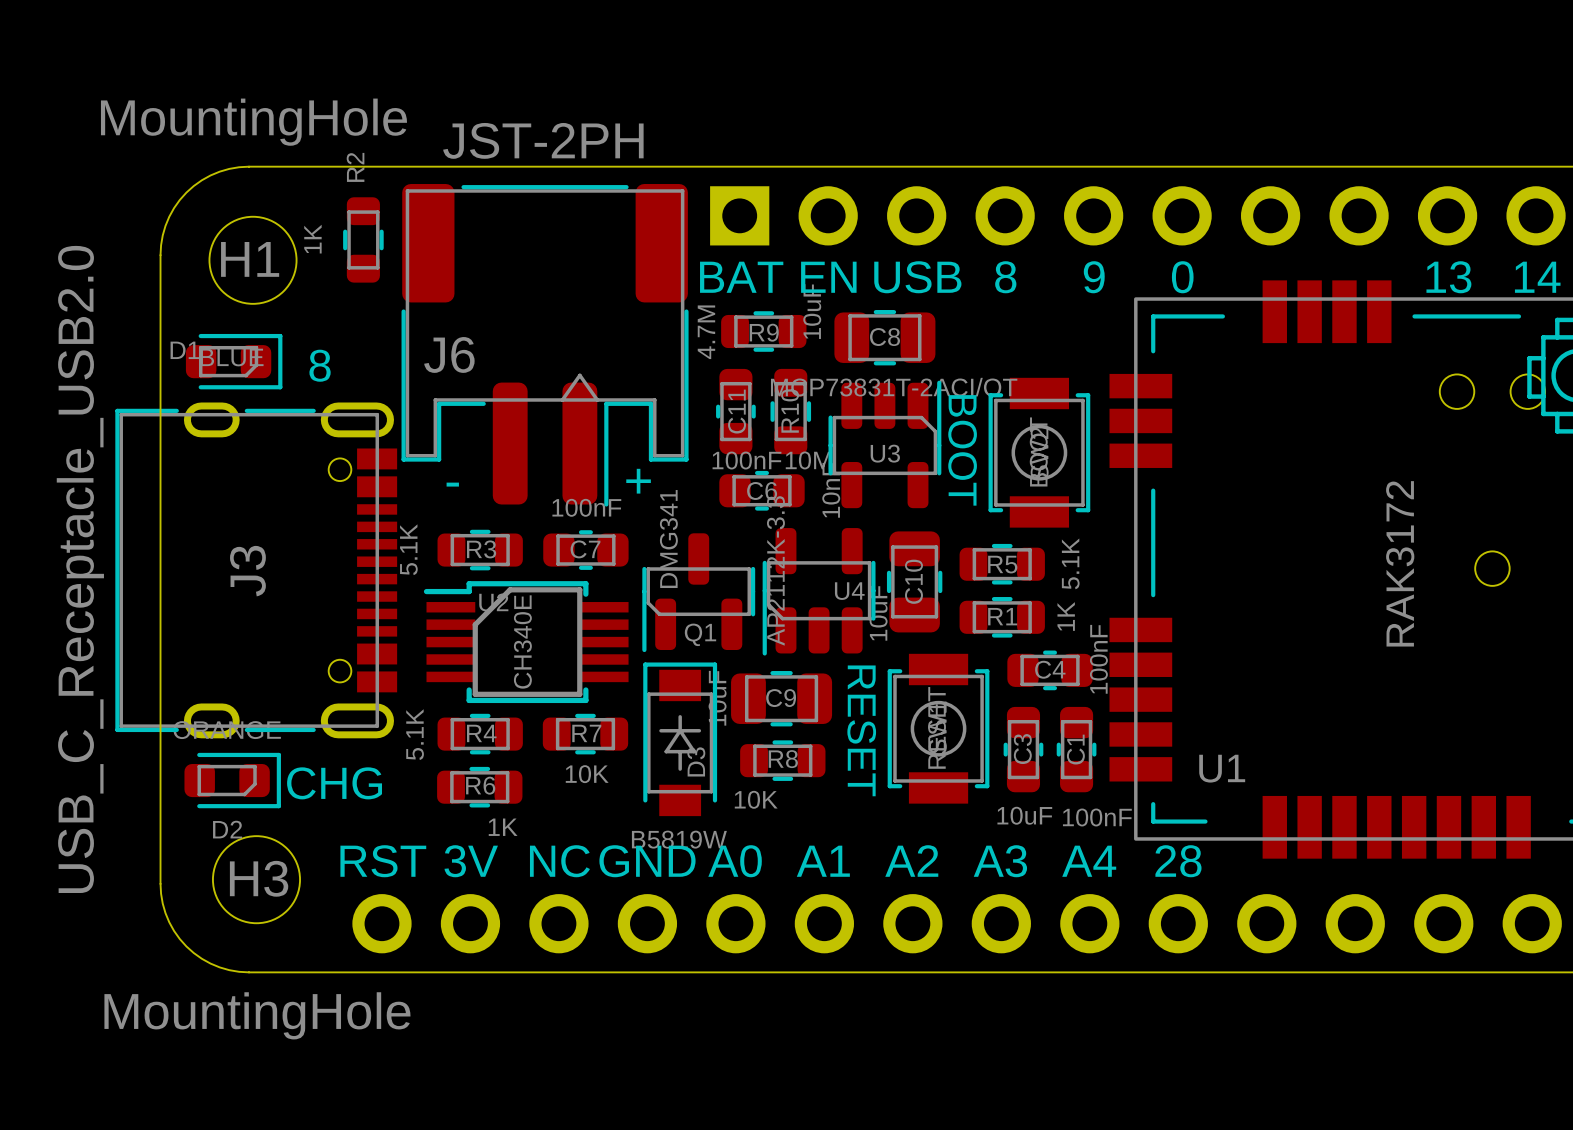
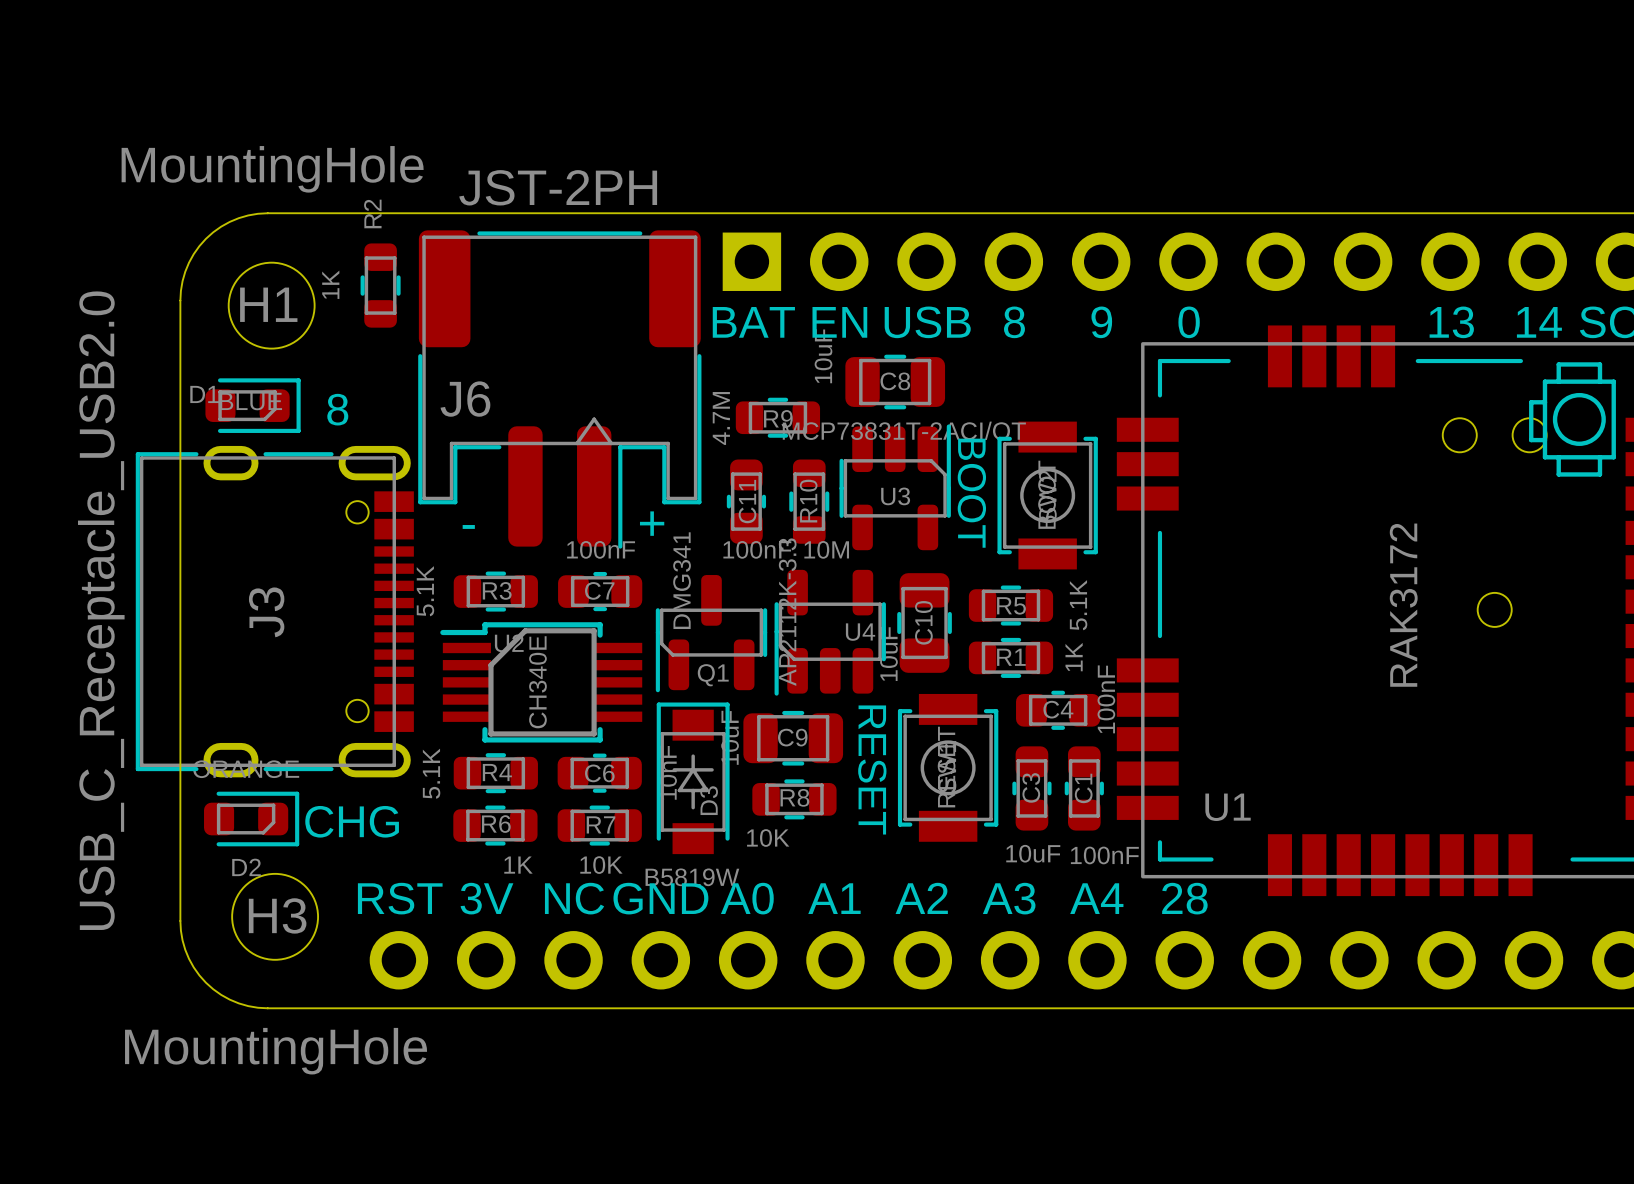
R9 position: (763, 331) -> (777, 417)
C11 position: (735, 411) -> (746, 501)
R10 position: (790, 411) -> (809, 501)
C6 position: (762, 490) -> (599, 773)
R7 position: (585, 734) -> (599, 825)

